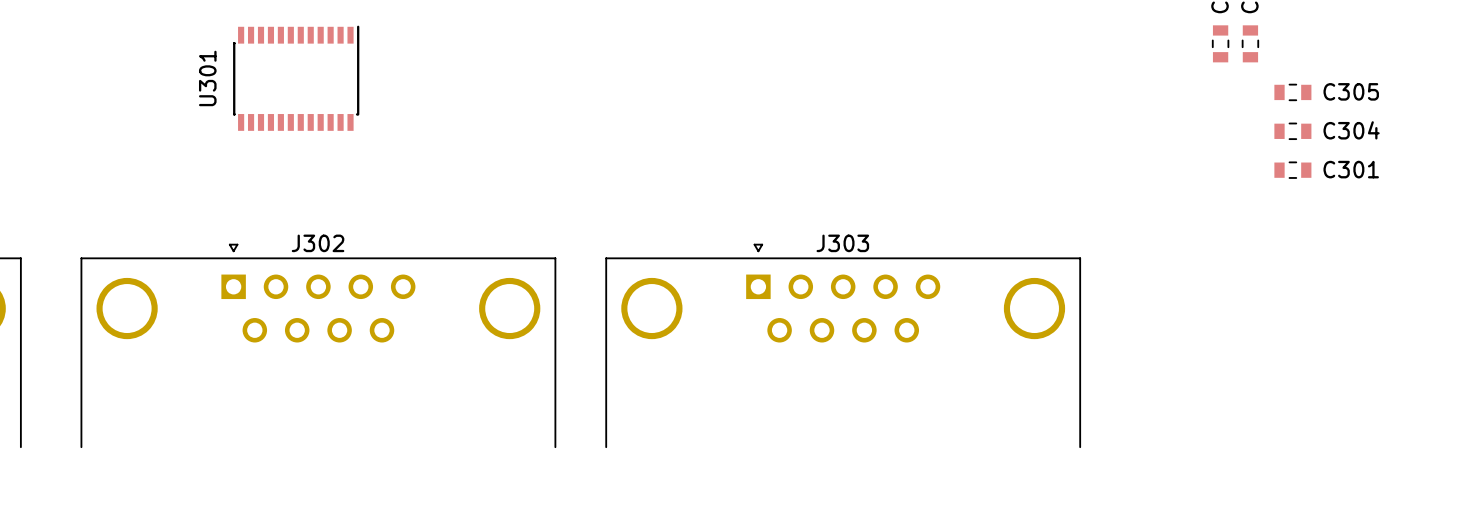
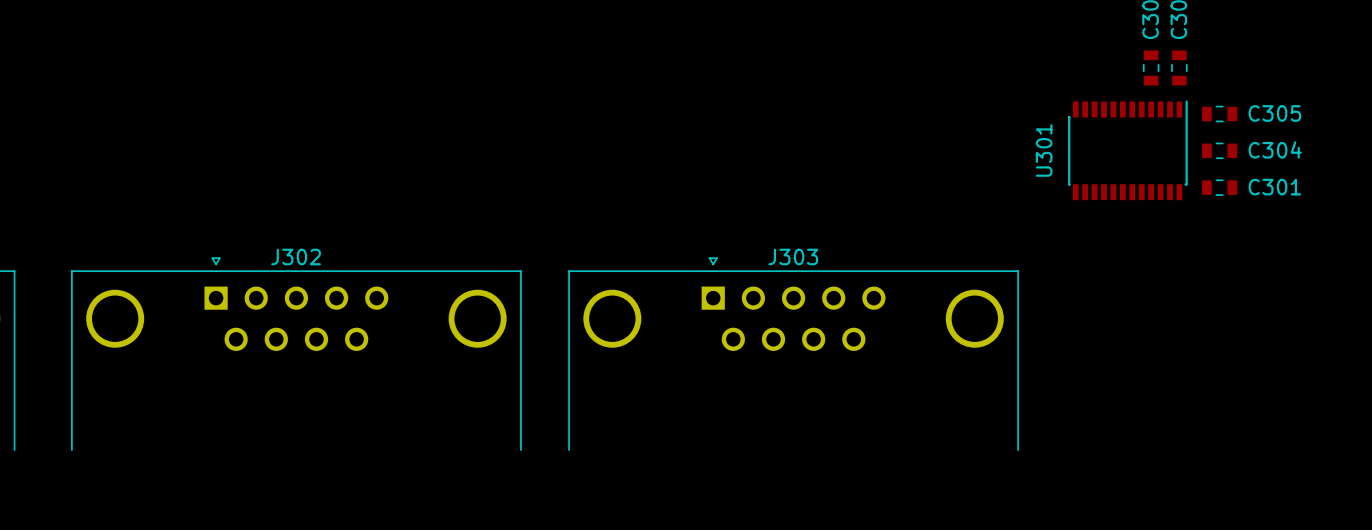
U301 position: (296, 78) -> (1127, 150)

